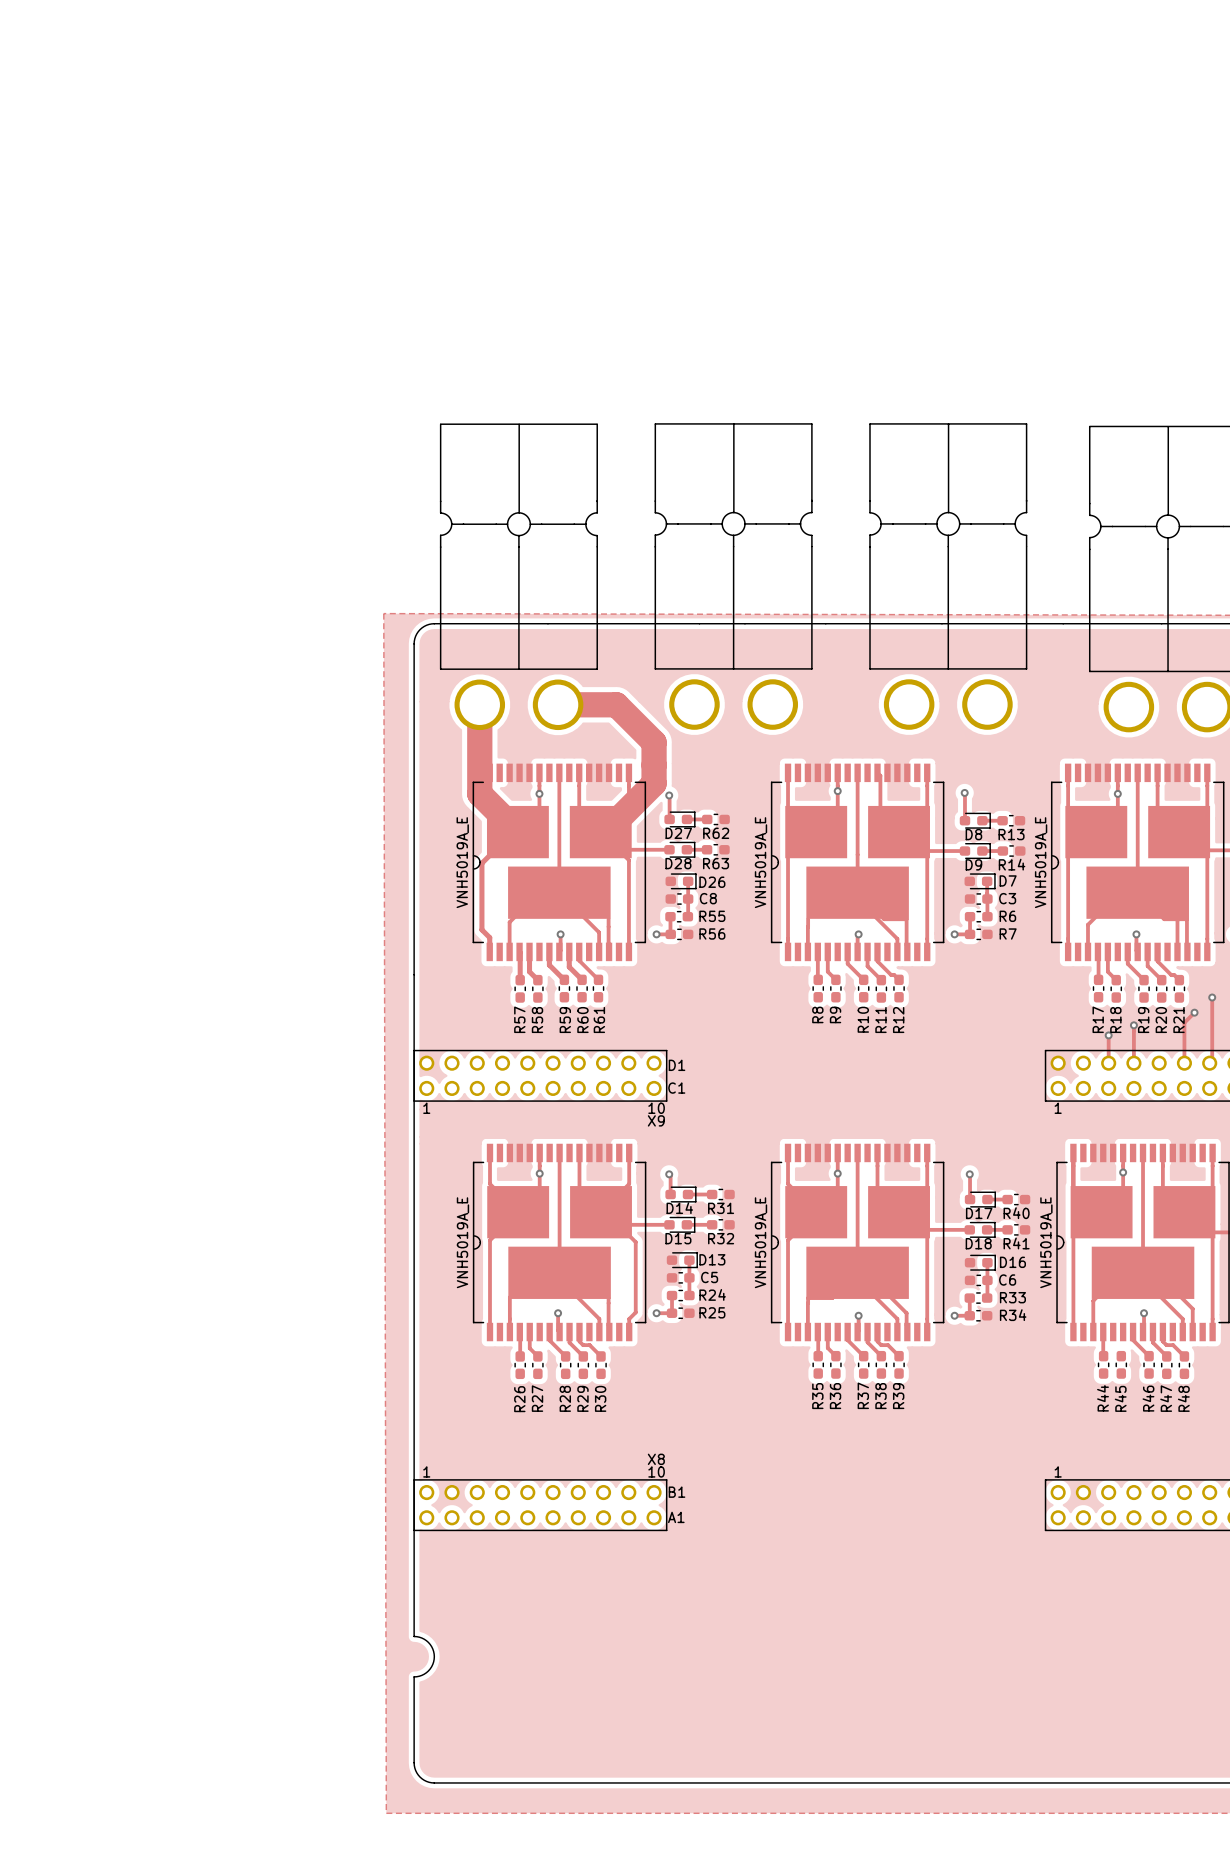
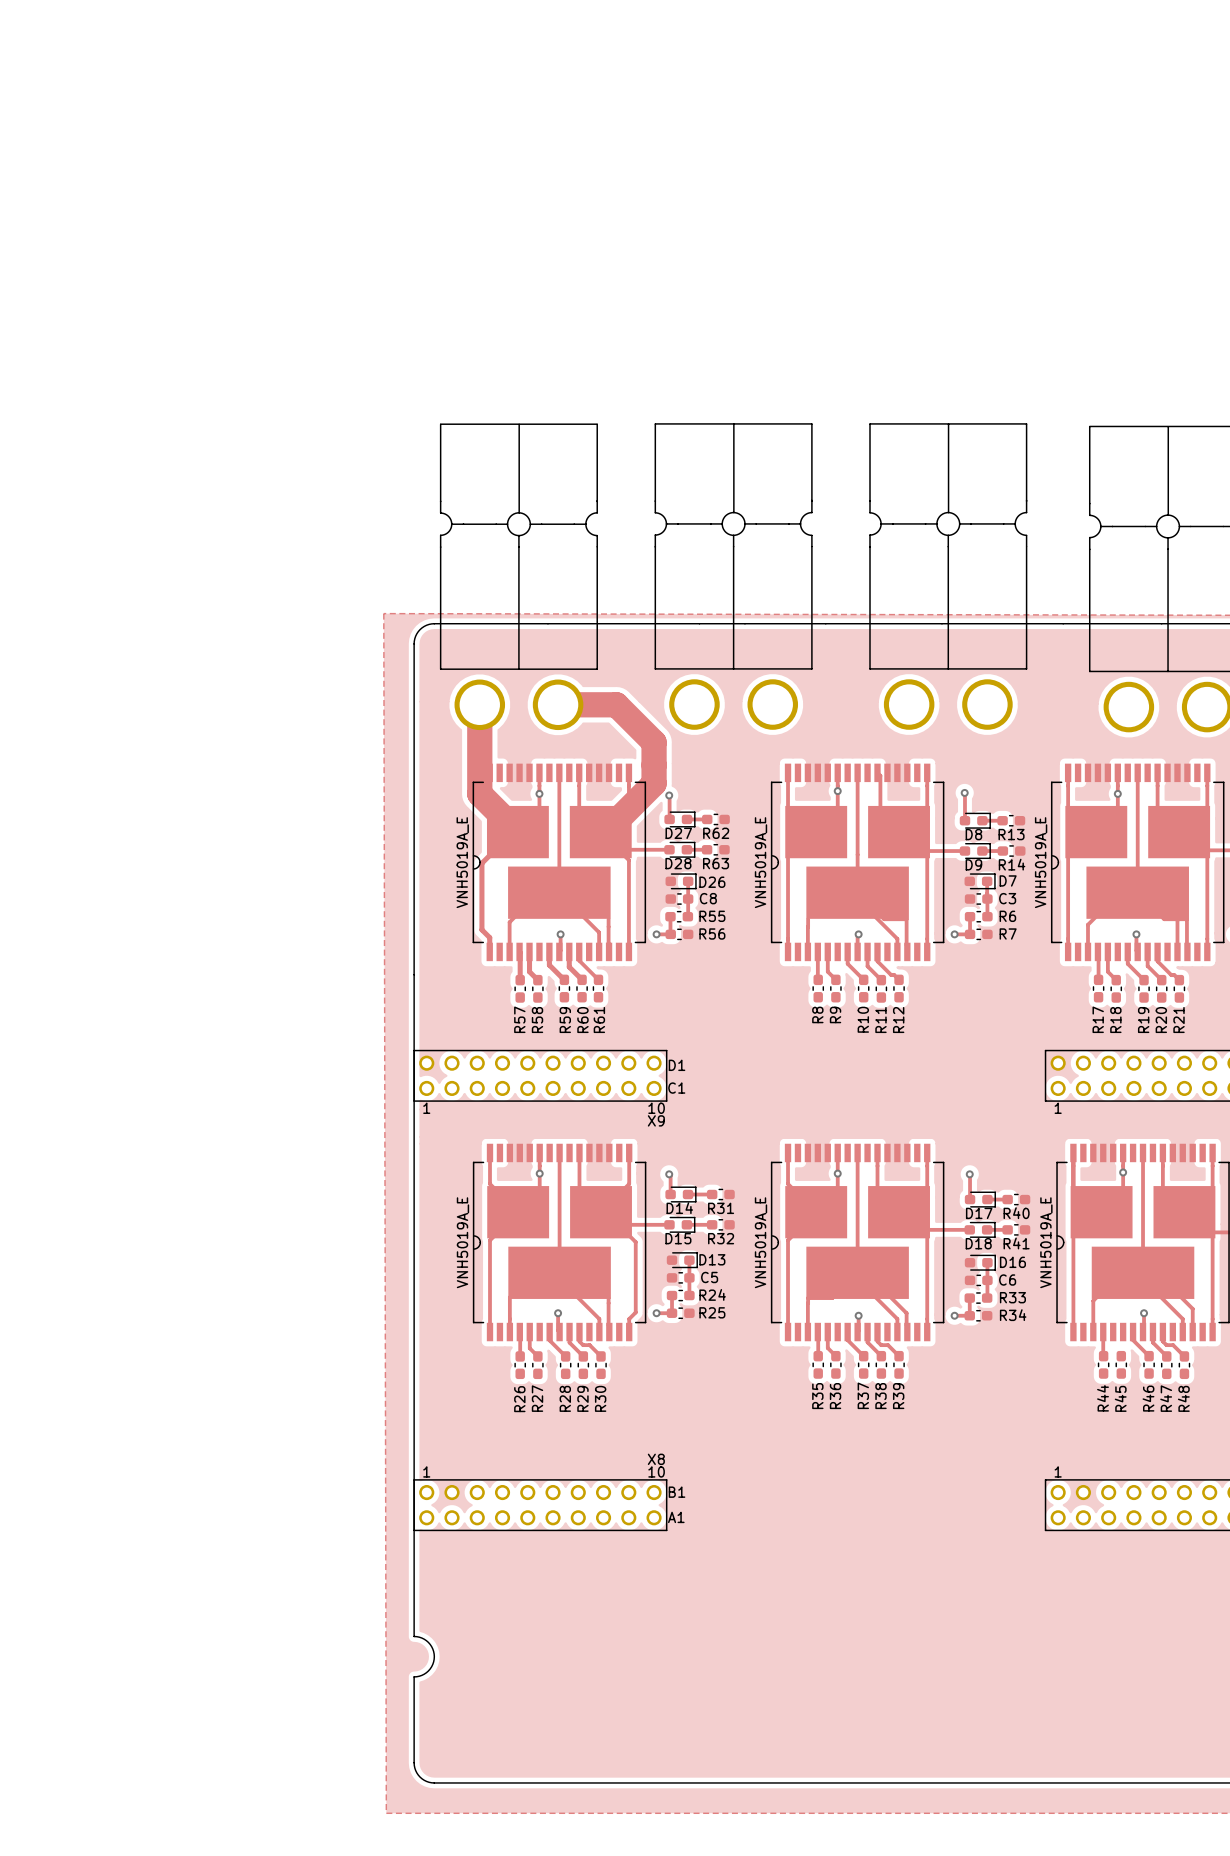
track: (1212, 997) (1212, 1060) (1209, 1063) -> none
via: (1212, 997) -> none
track: (1194, 1012) (1184, 1022) (1184, 1063) -> none
via: (1194, 1012) -> none
track: (1133, 1025) (1133, 1063) -> none
via: (1133, 1025) -> none
track: (1108, 1035) (1108, 1063) -> none
via: (1108, 1035) -> none

